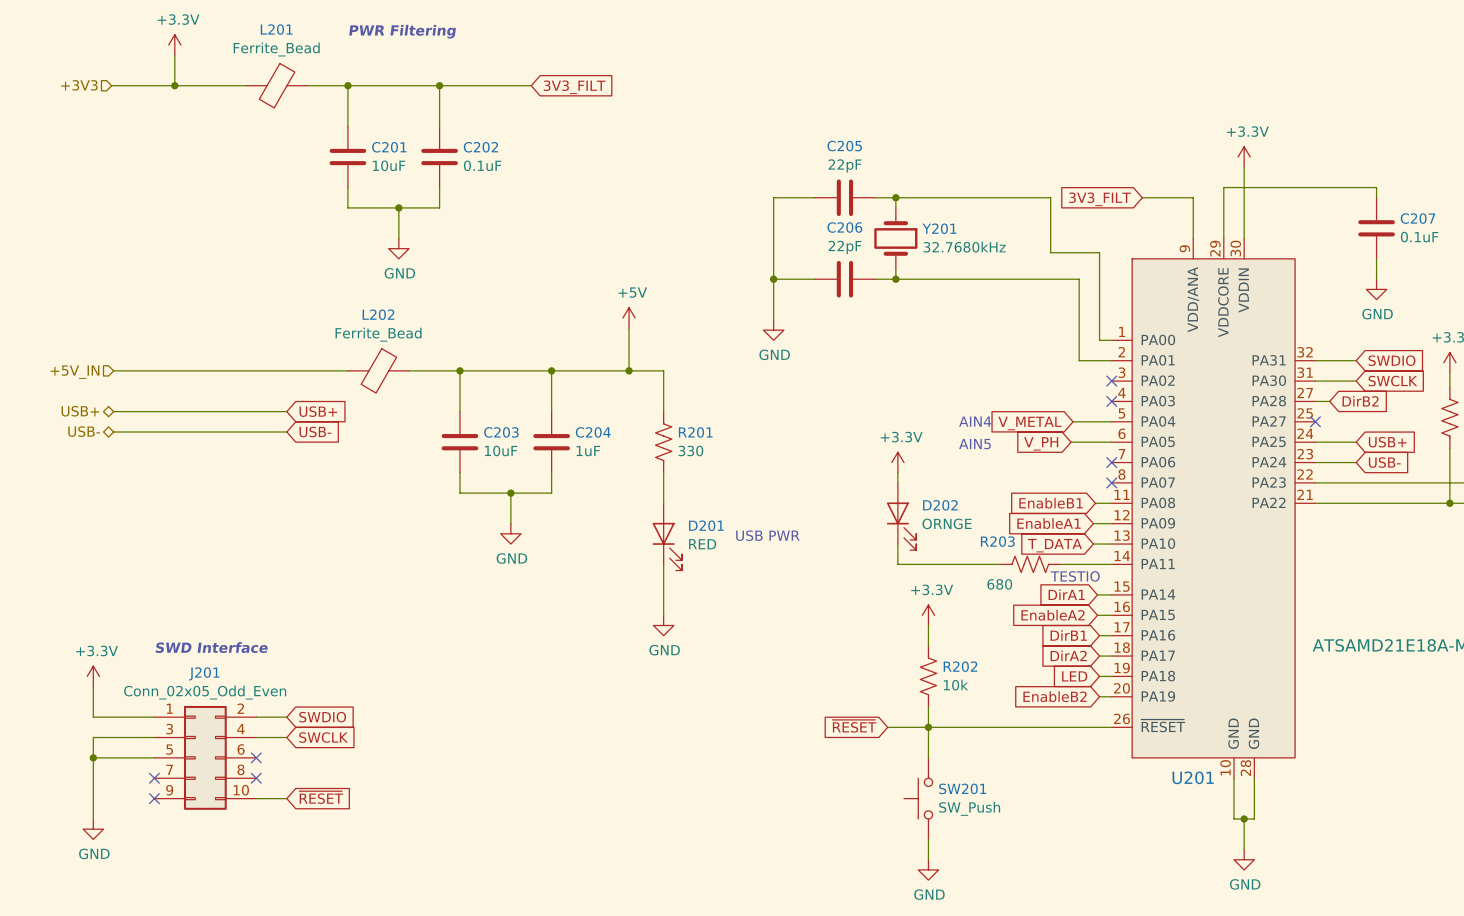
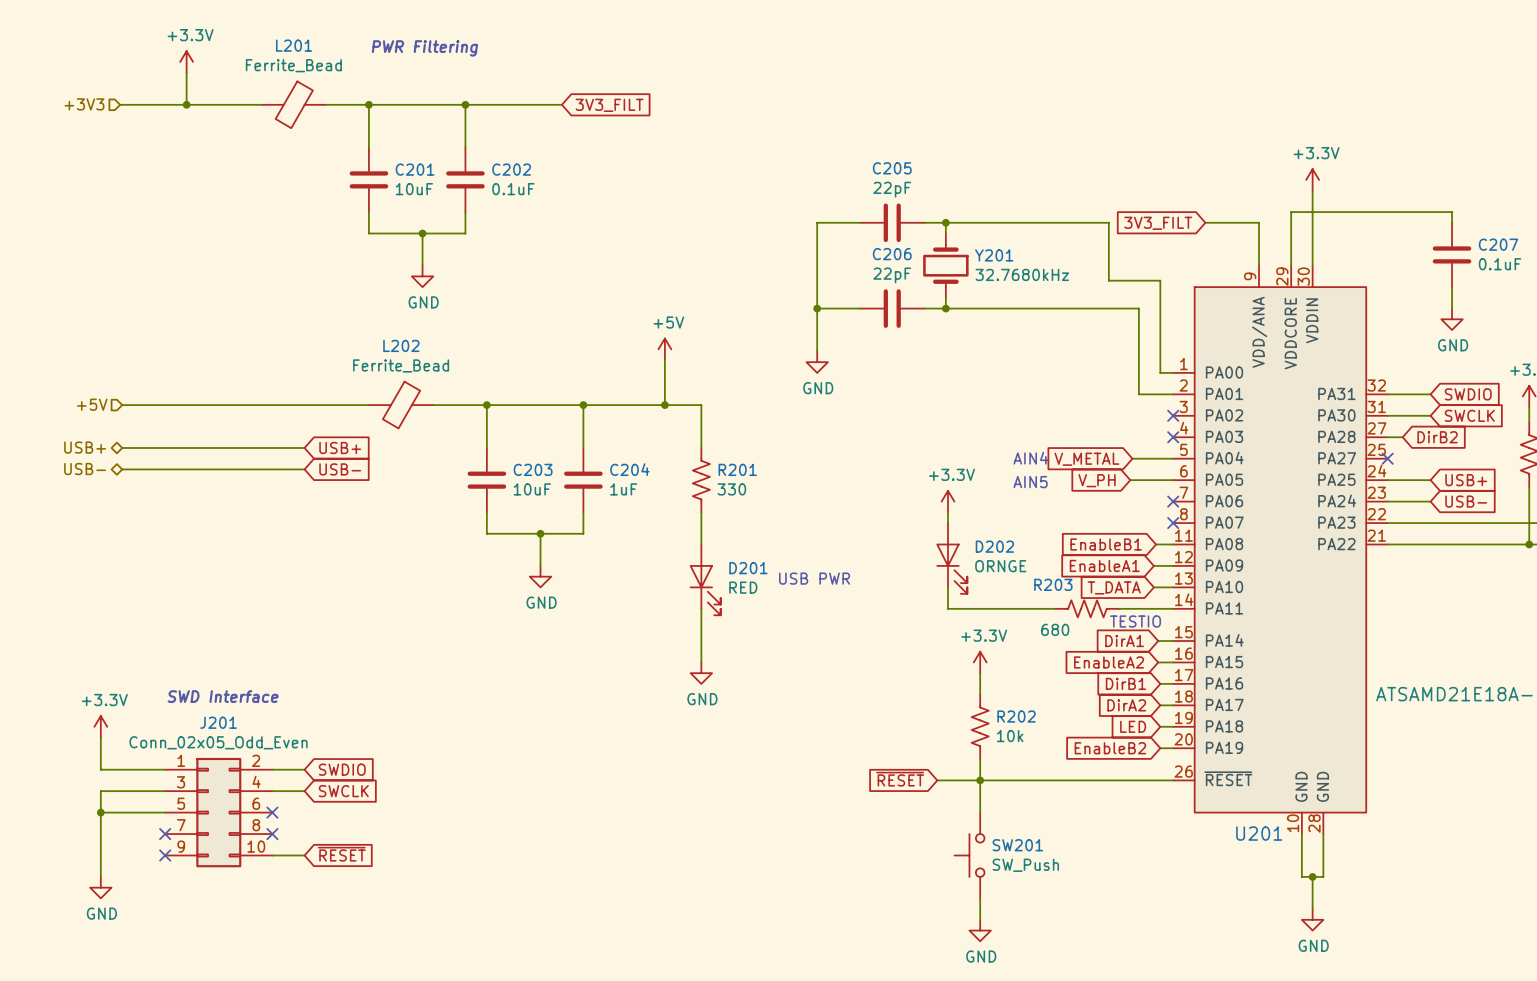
hierarchical label: +5V_IN (74, 372) -> +5V (92, 404)

